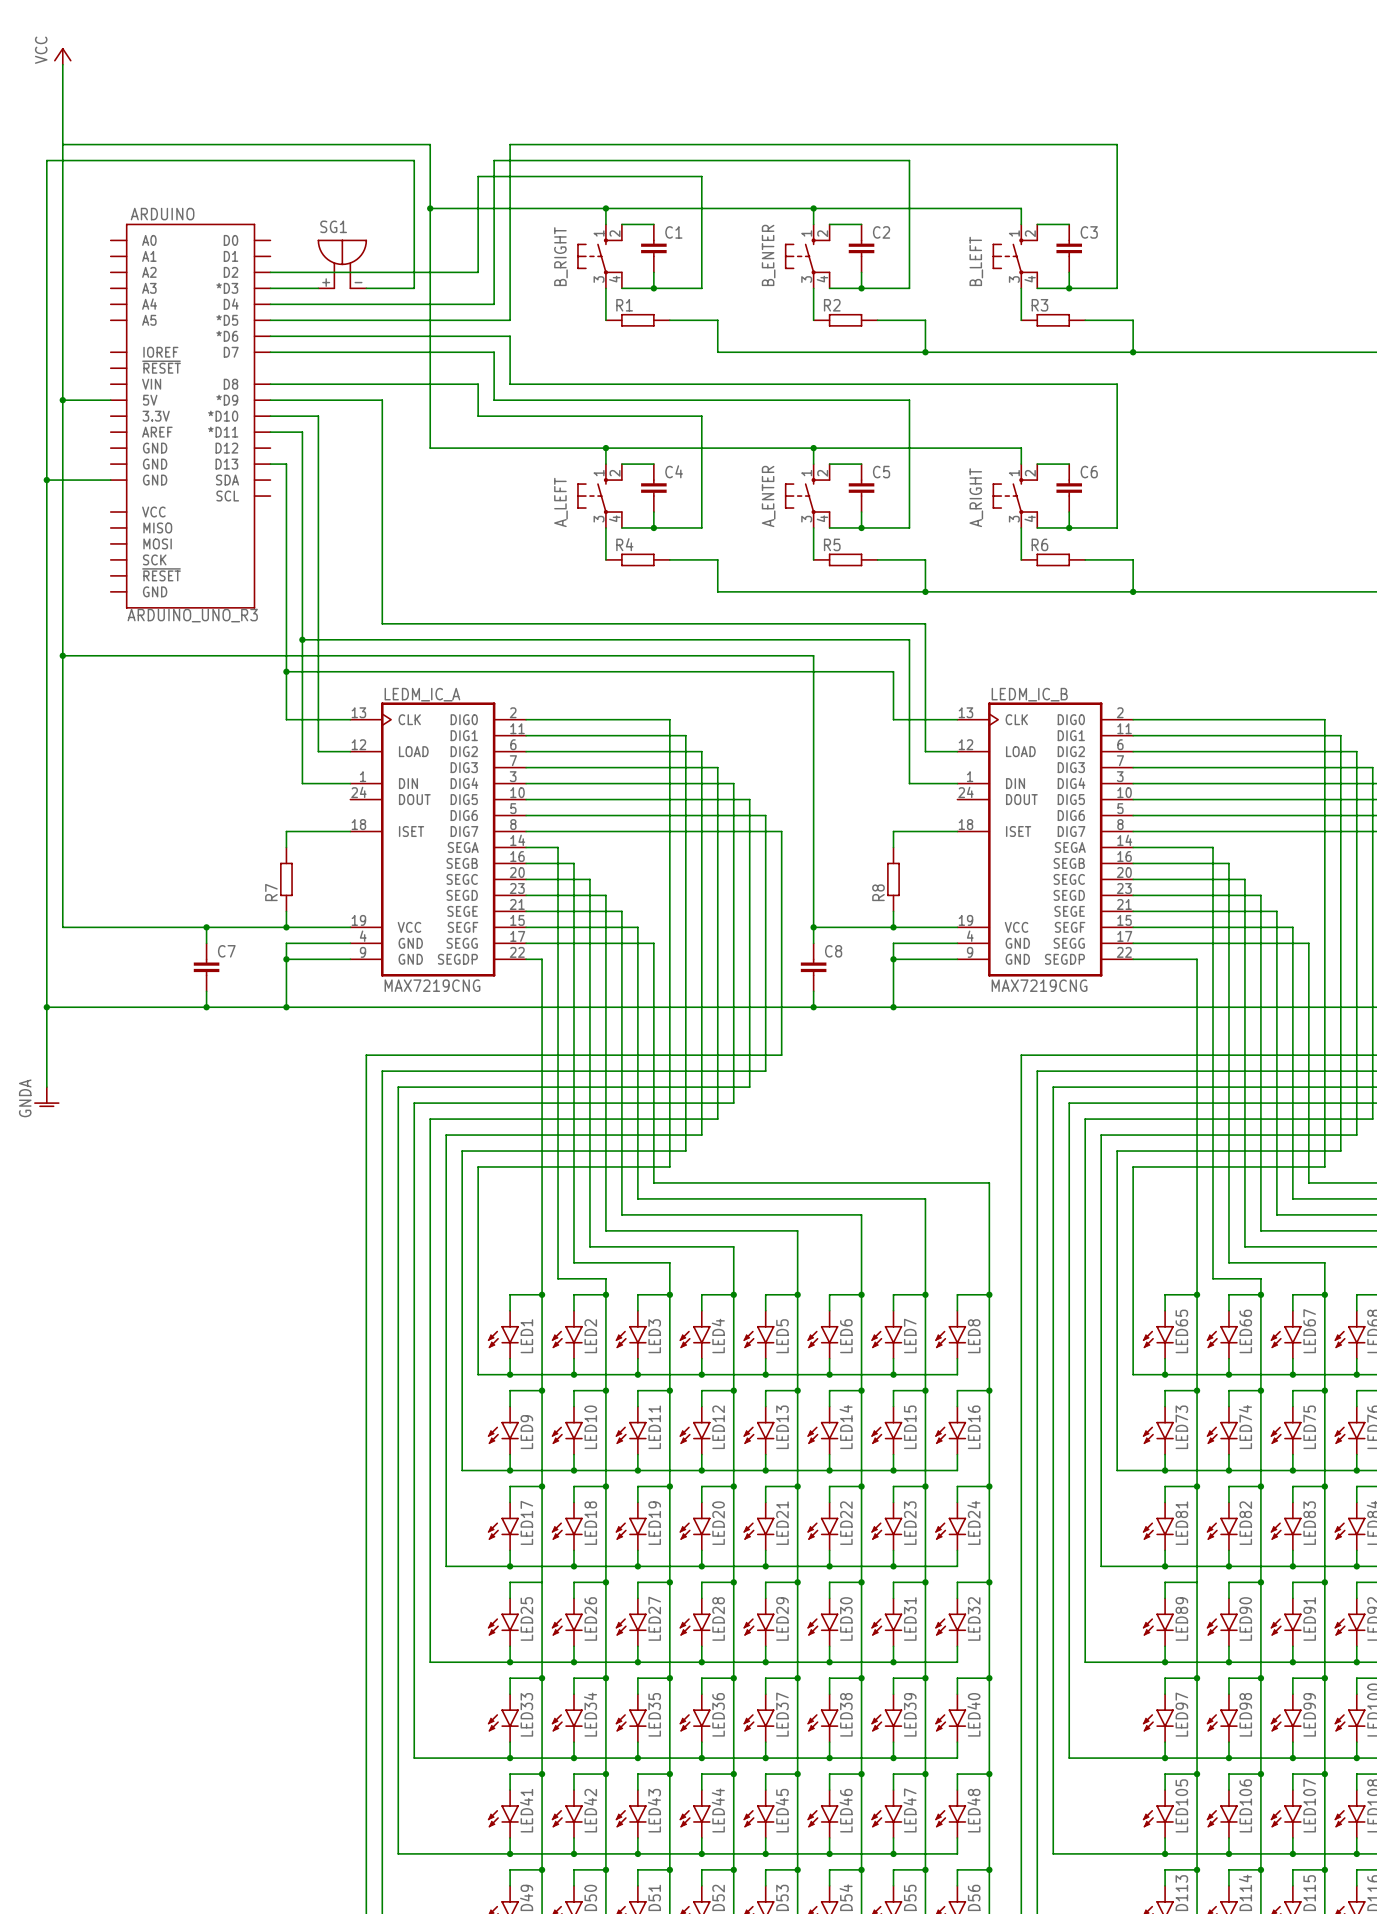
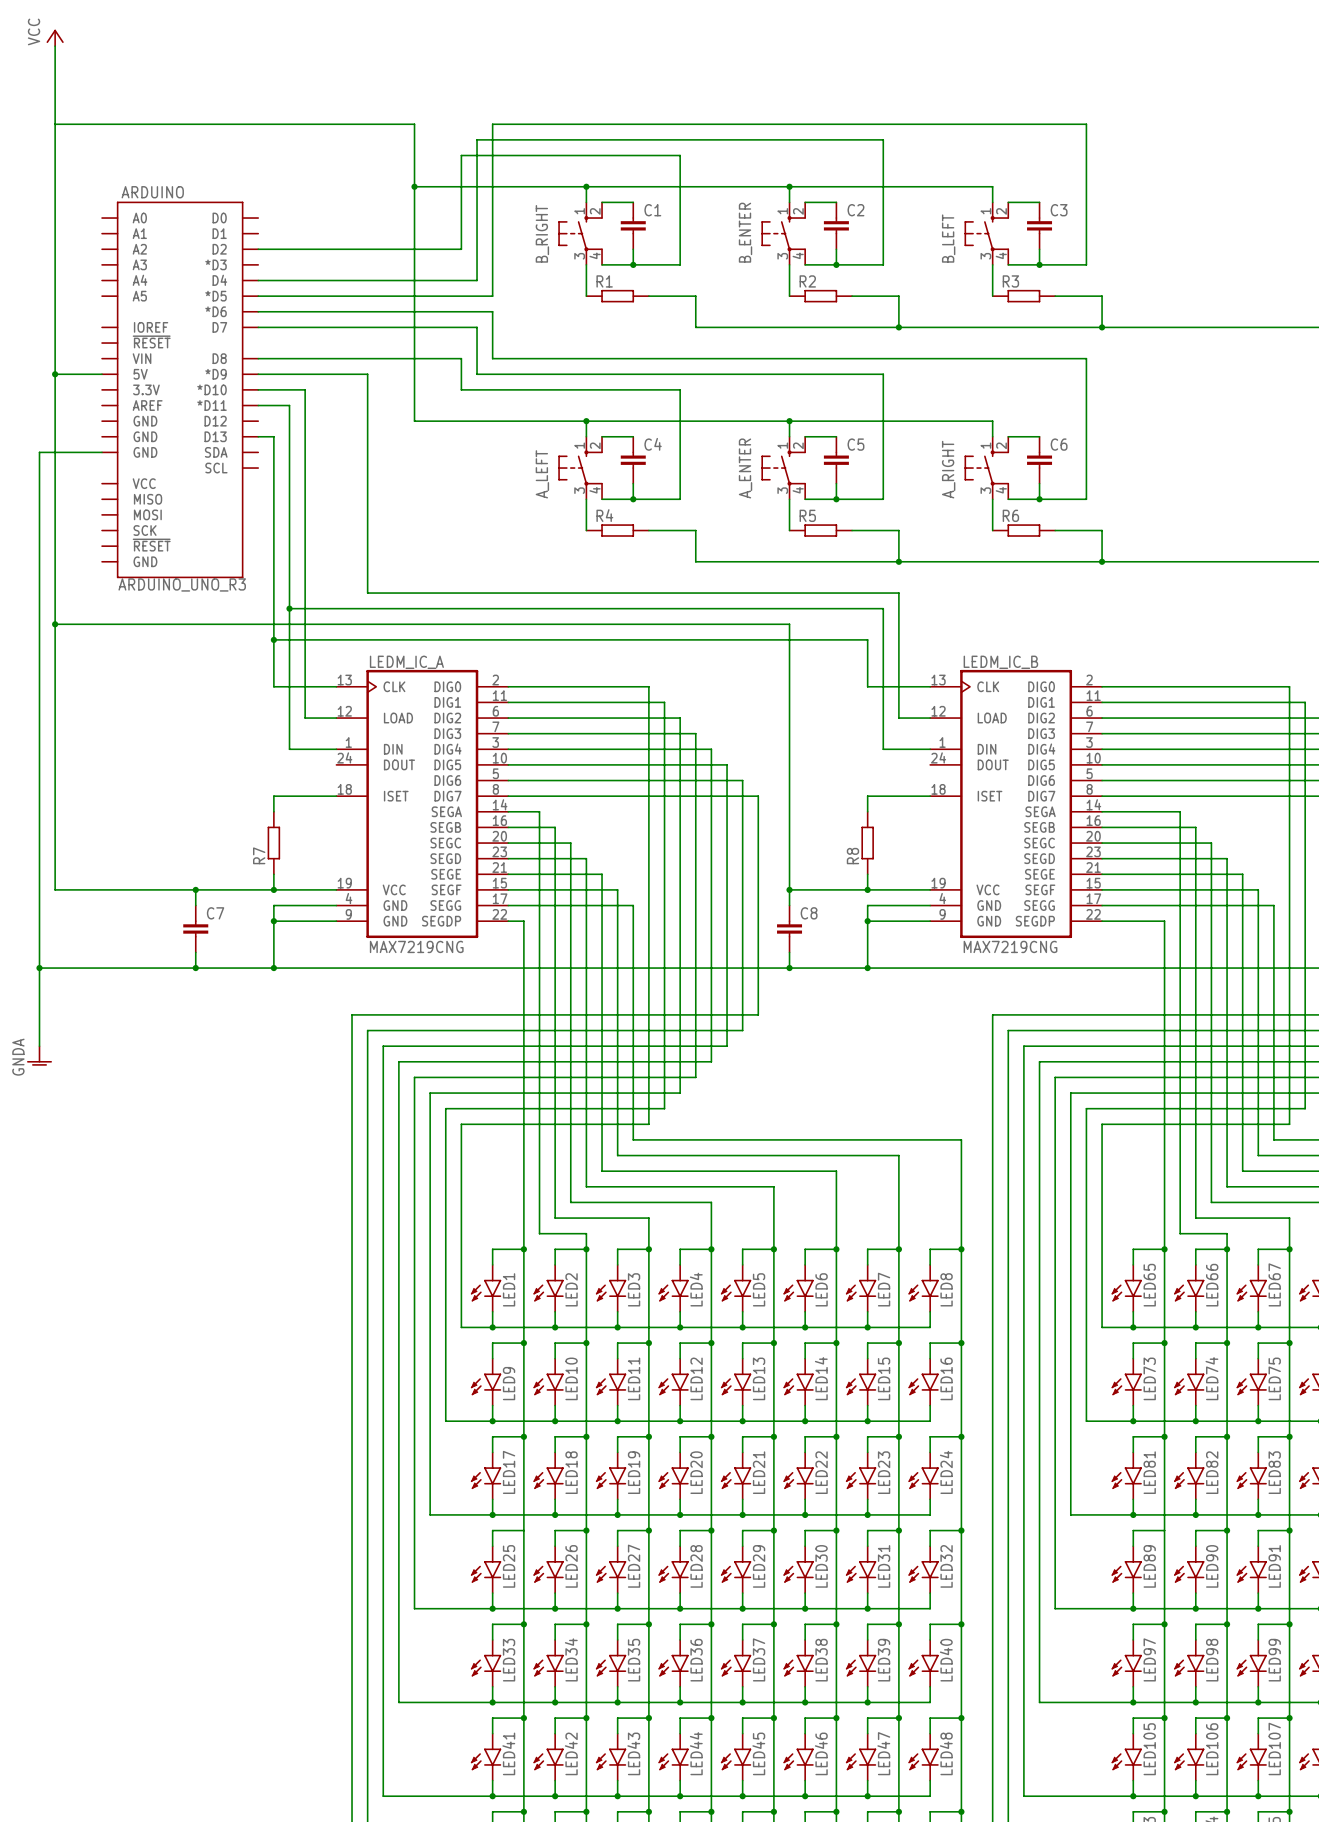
SG1: (342, 264) -> none
wire: (270, 288) (318, 288) -> none
wire: (366, 288) (414, 288) (414, 160) (46, 160) (46, 480) -> none
junction: (46, 480) -> none

